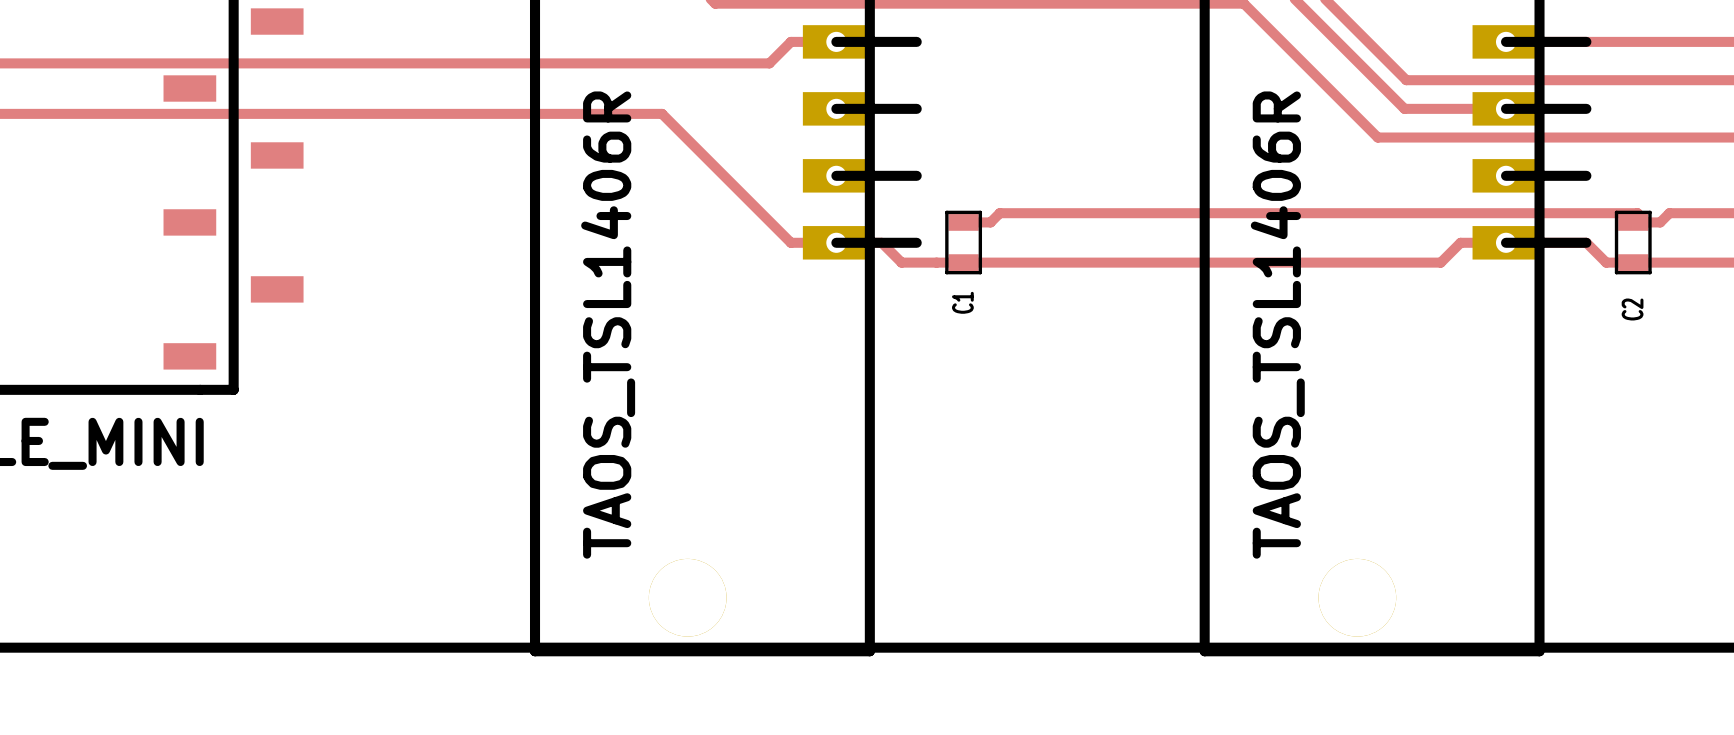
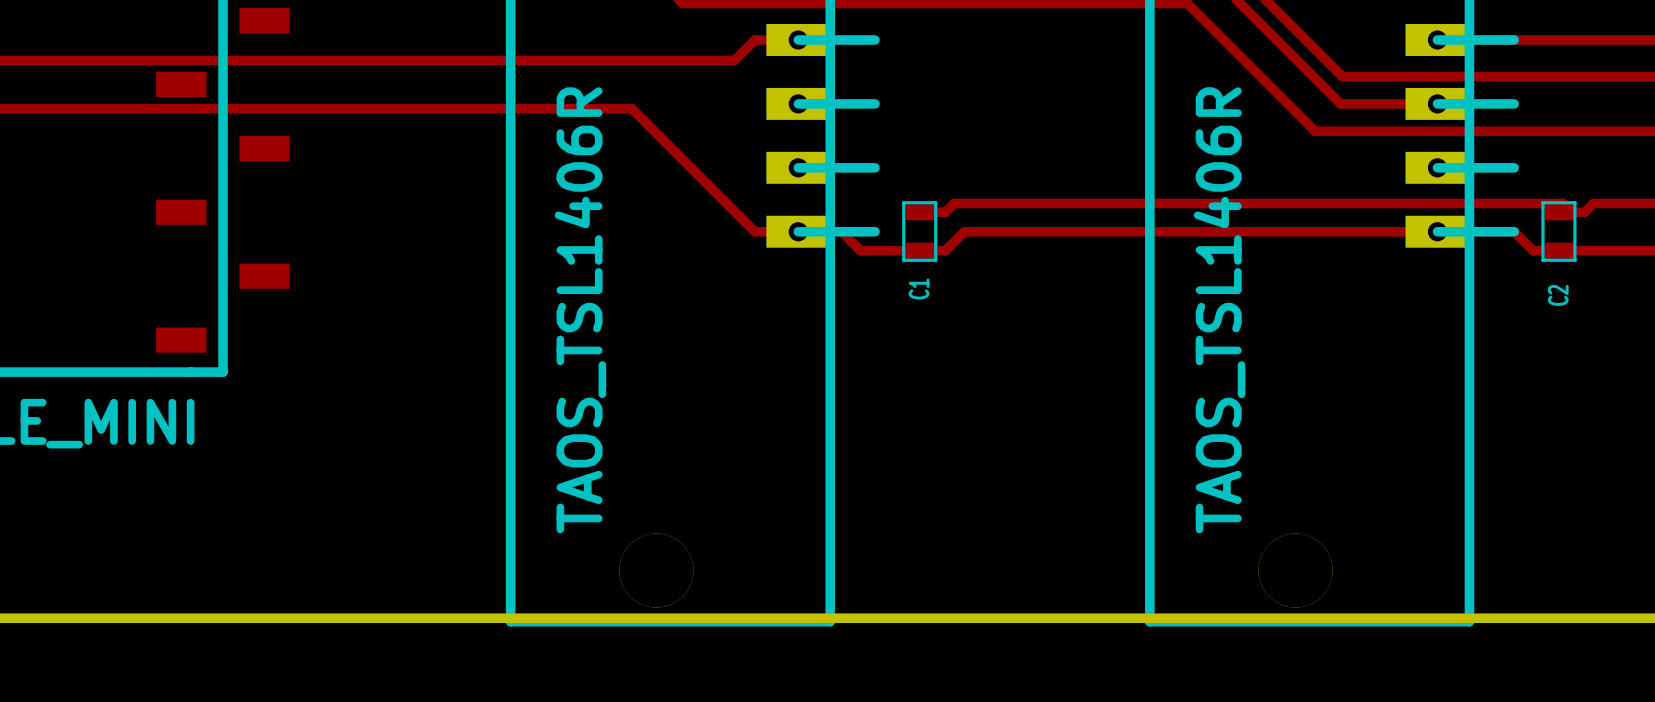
track: (1460, 242) (1440, 262) (990, 262) -> (1394, 231) (964, 231) (945, 250)

